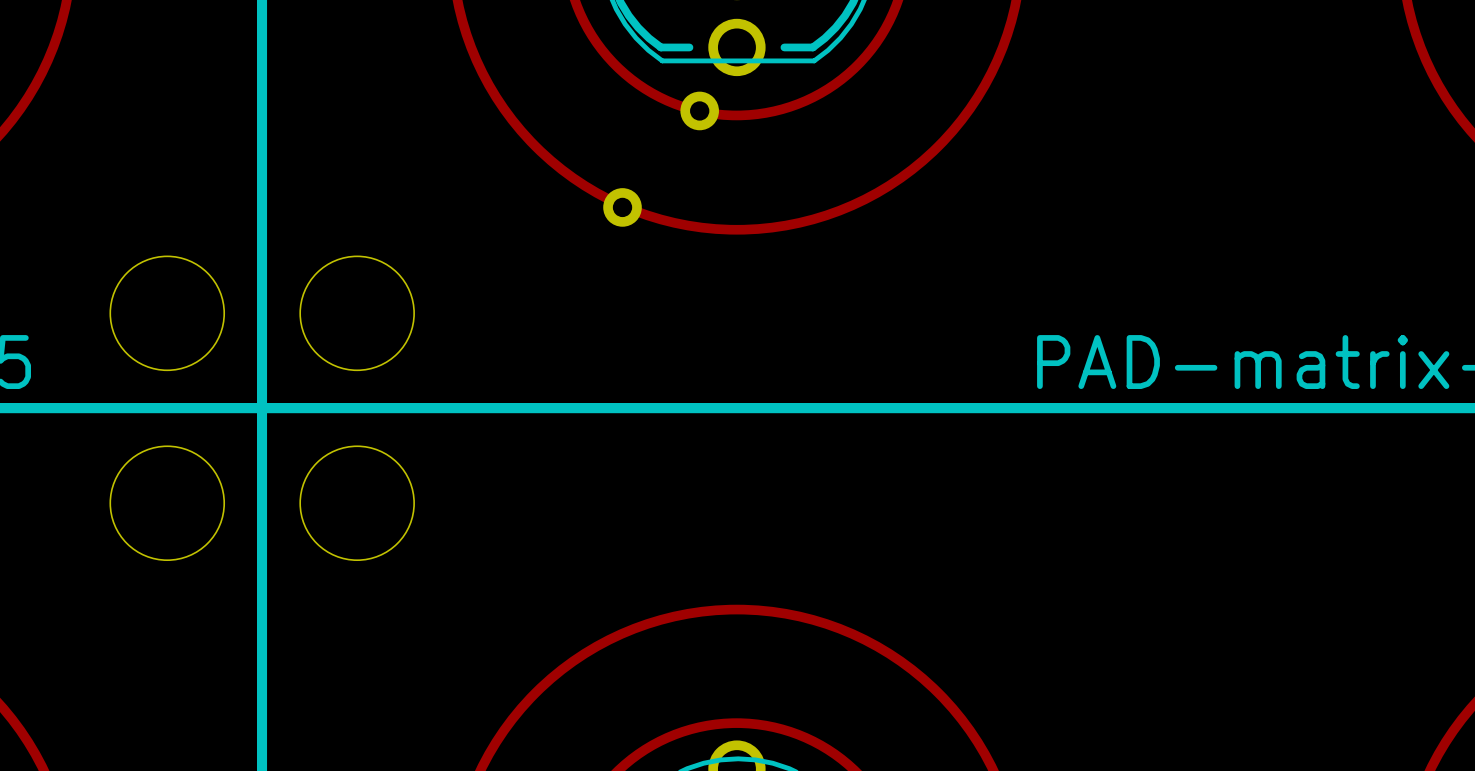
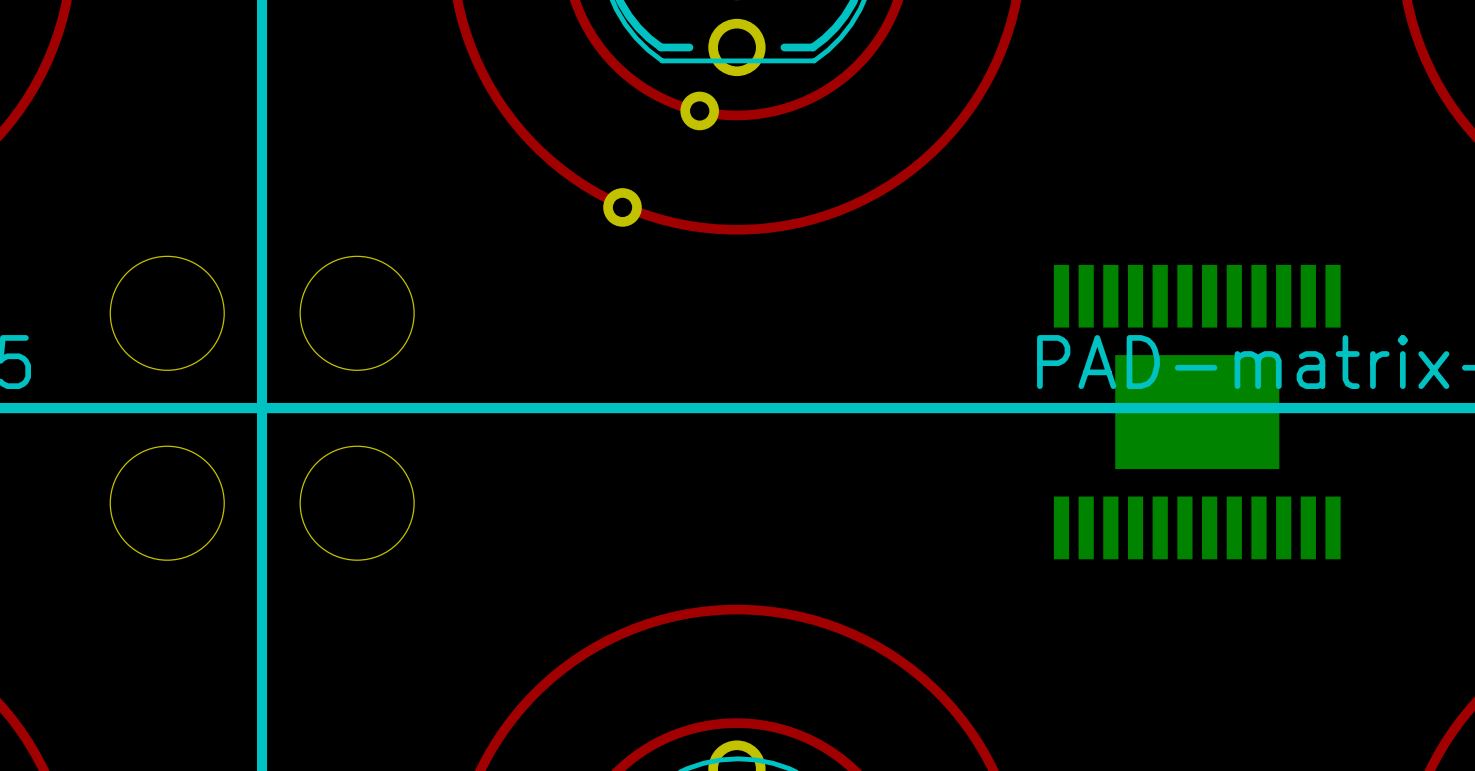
part: none -> (1197, 412)

